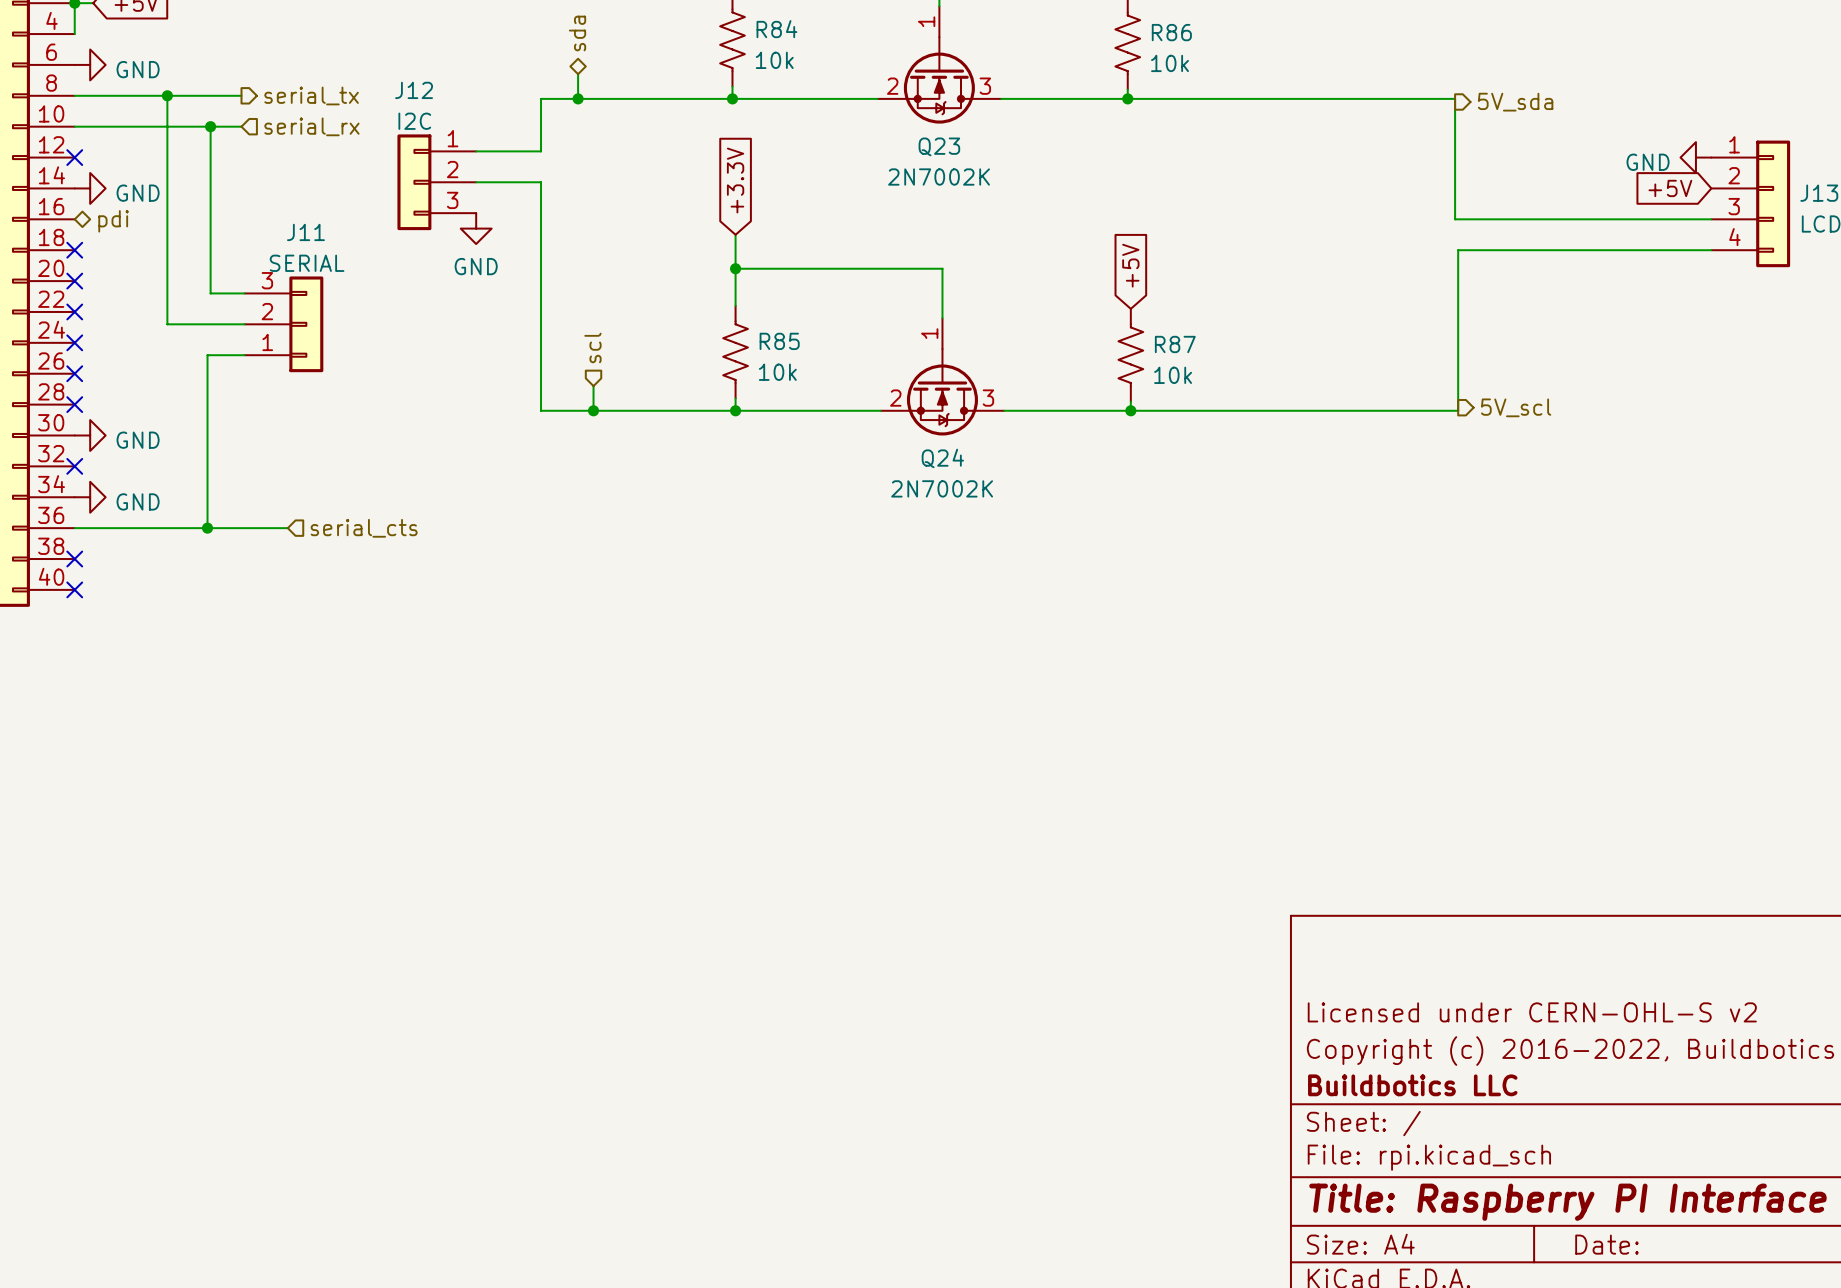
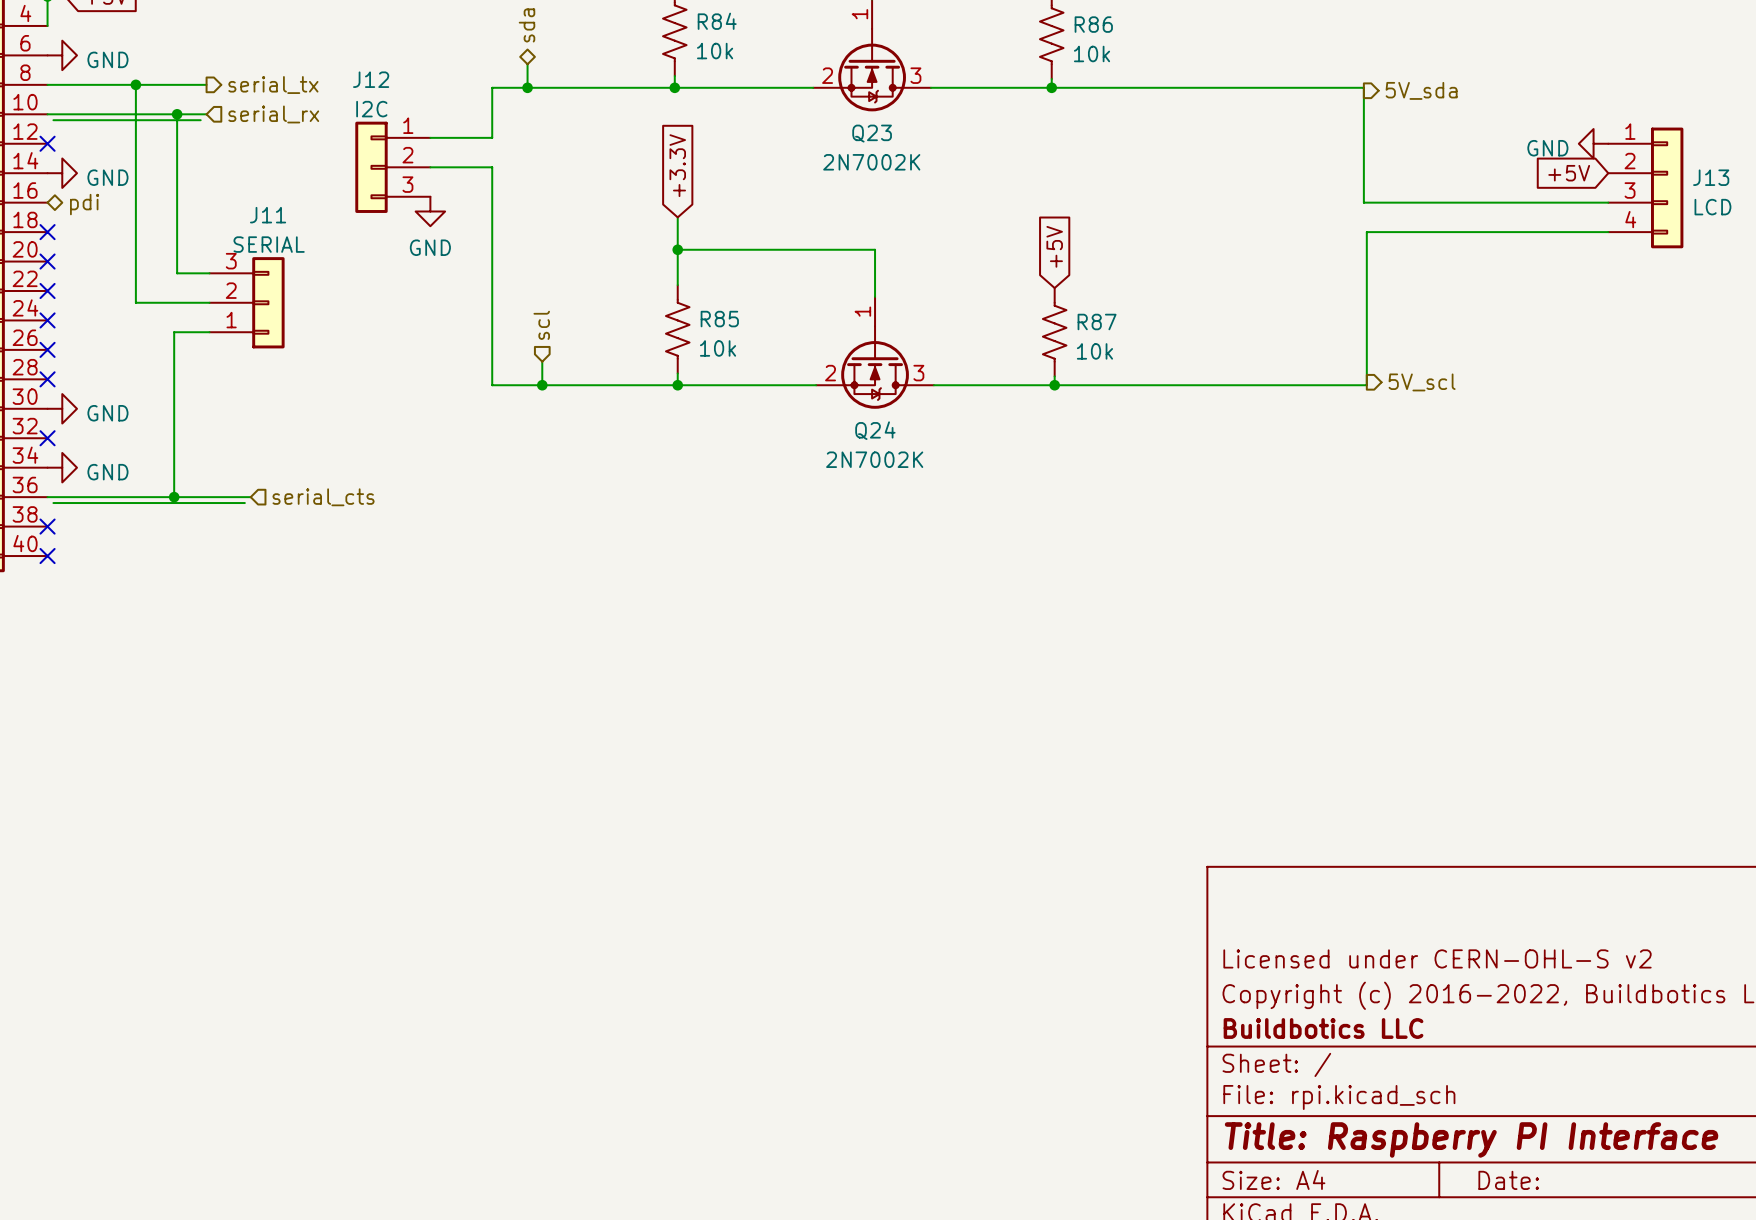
wire: none -> (53, 120) (200, 120)
wire: none -> (53, 503) (244, 503)

